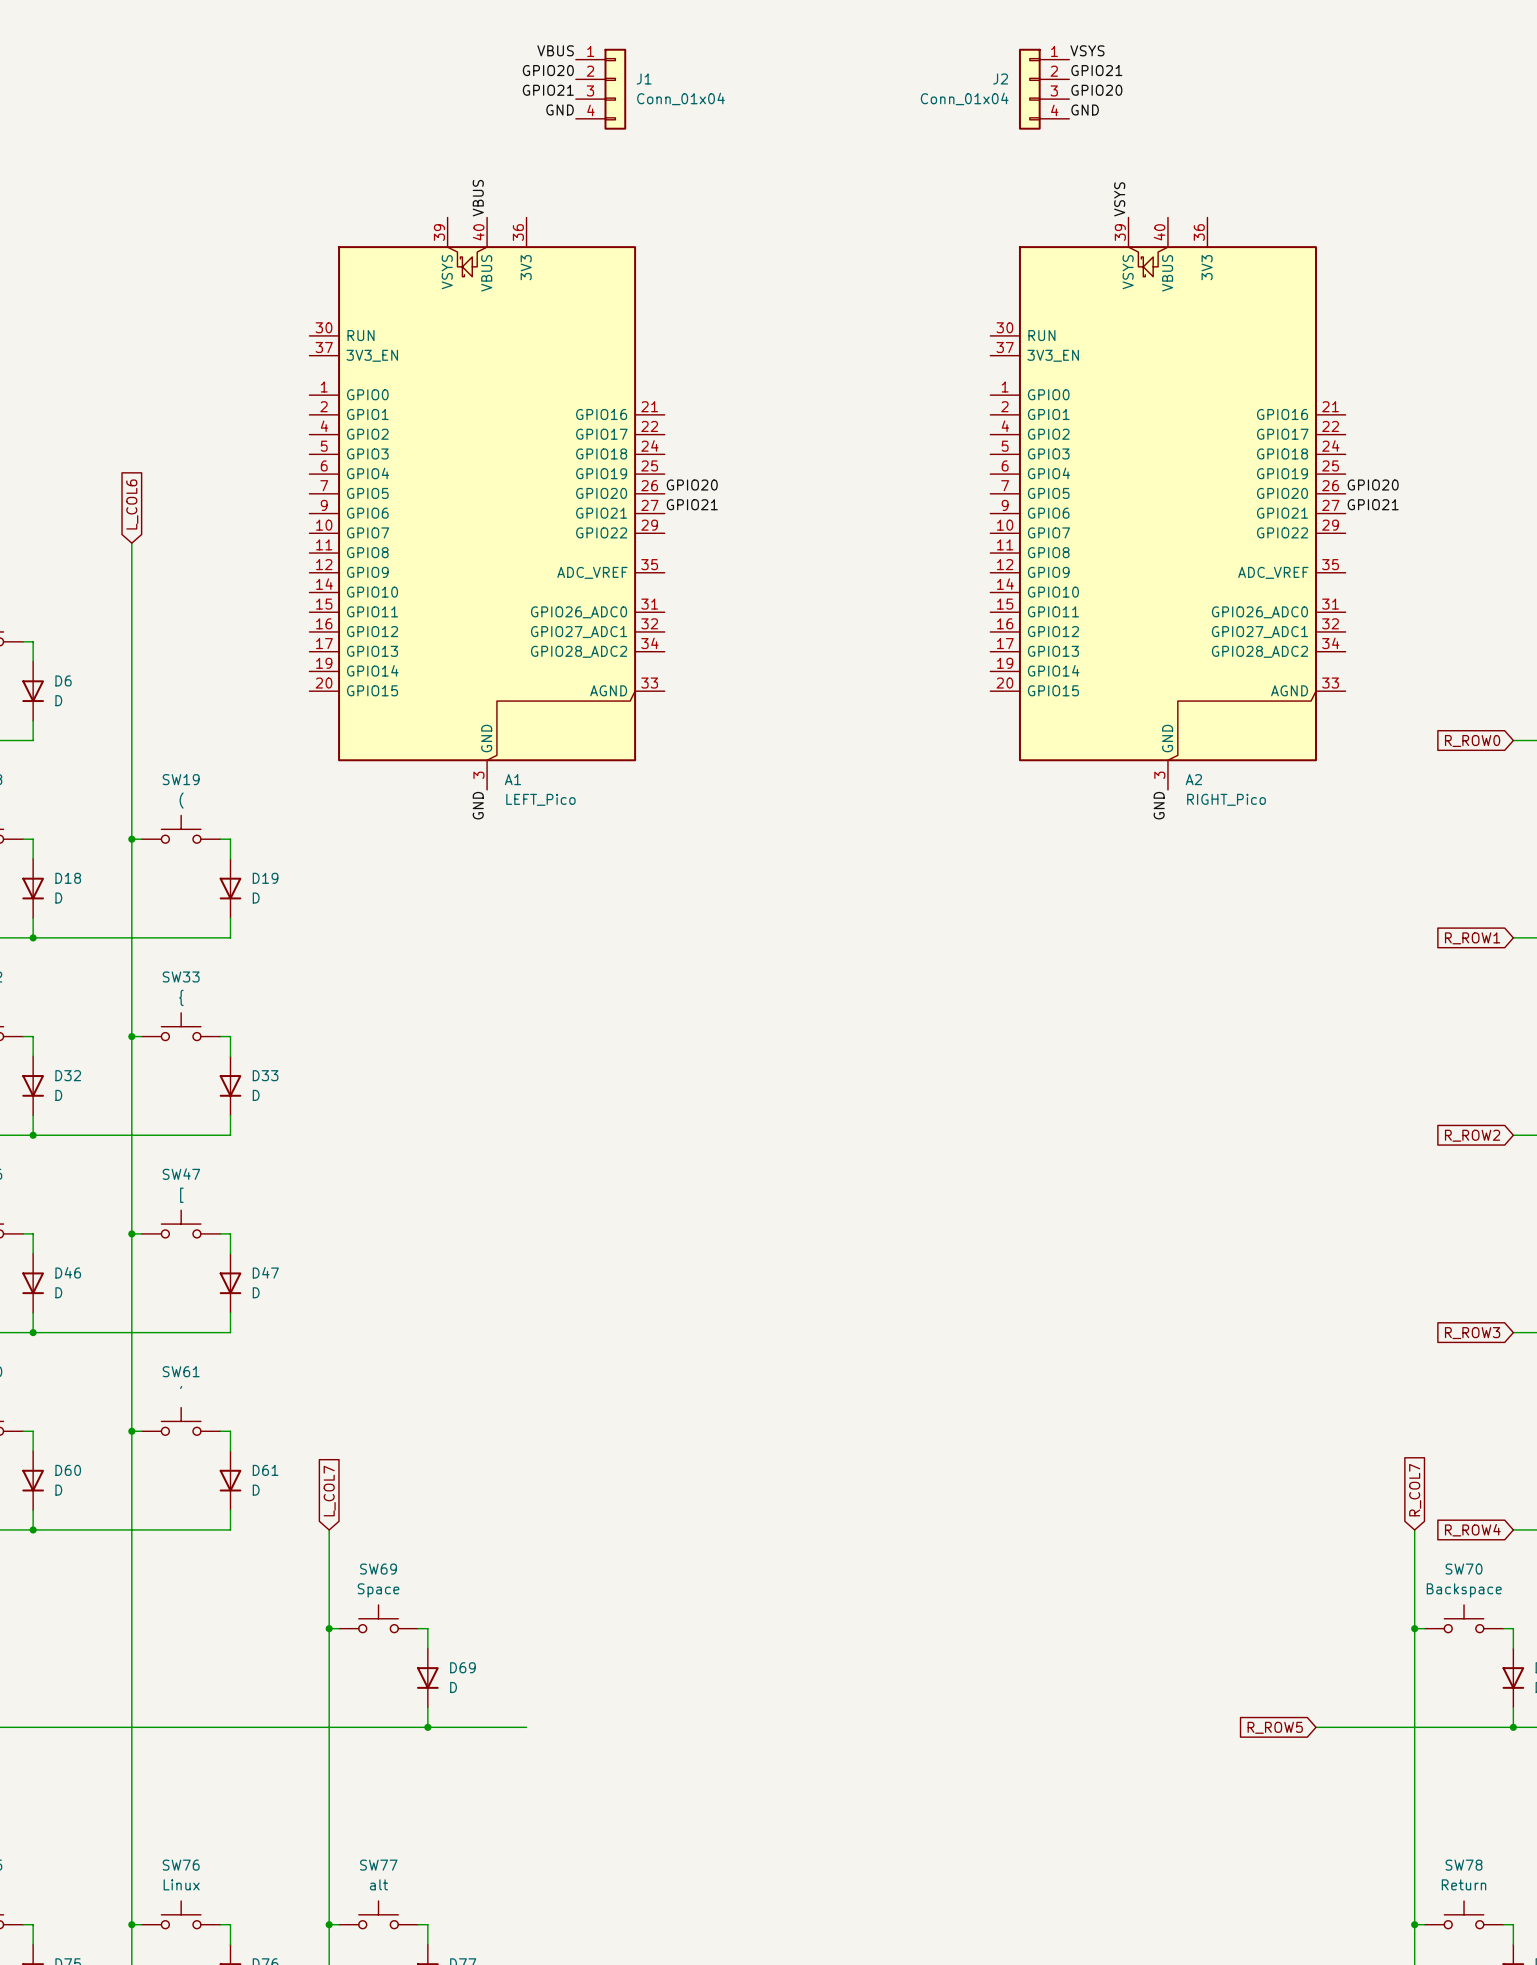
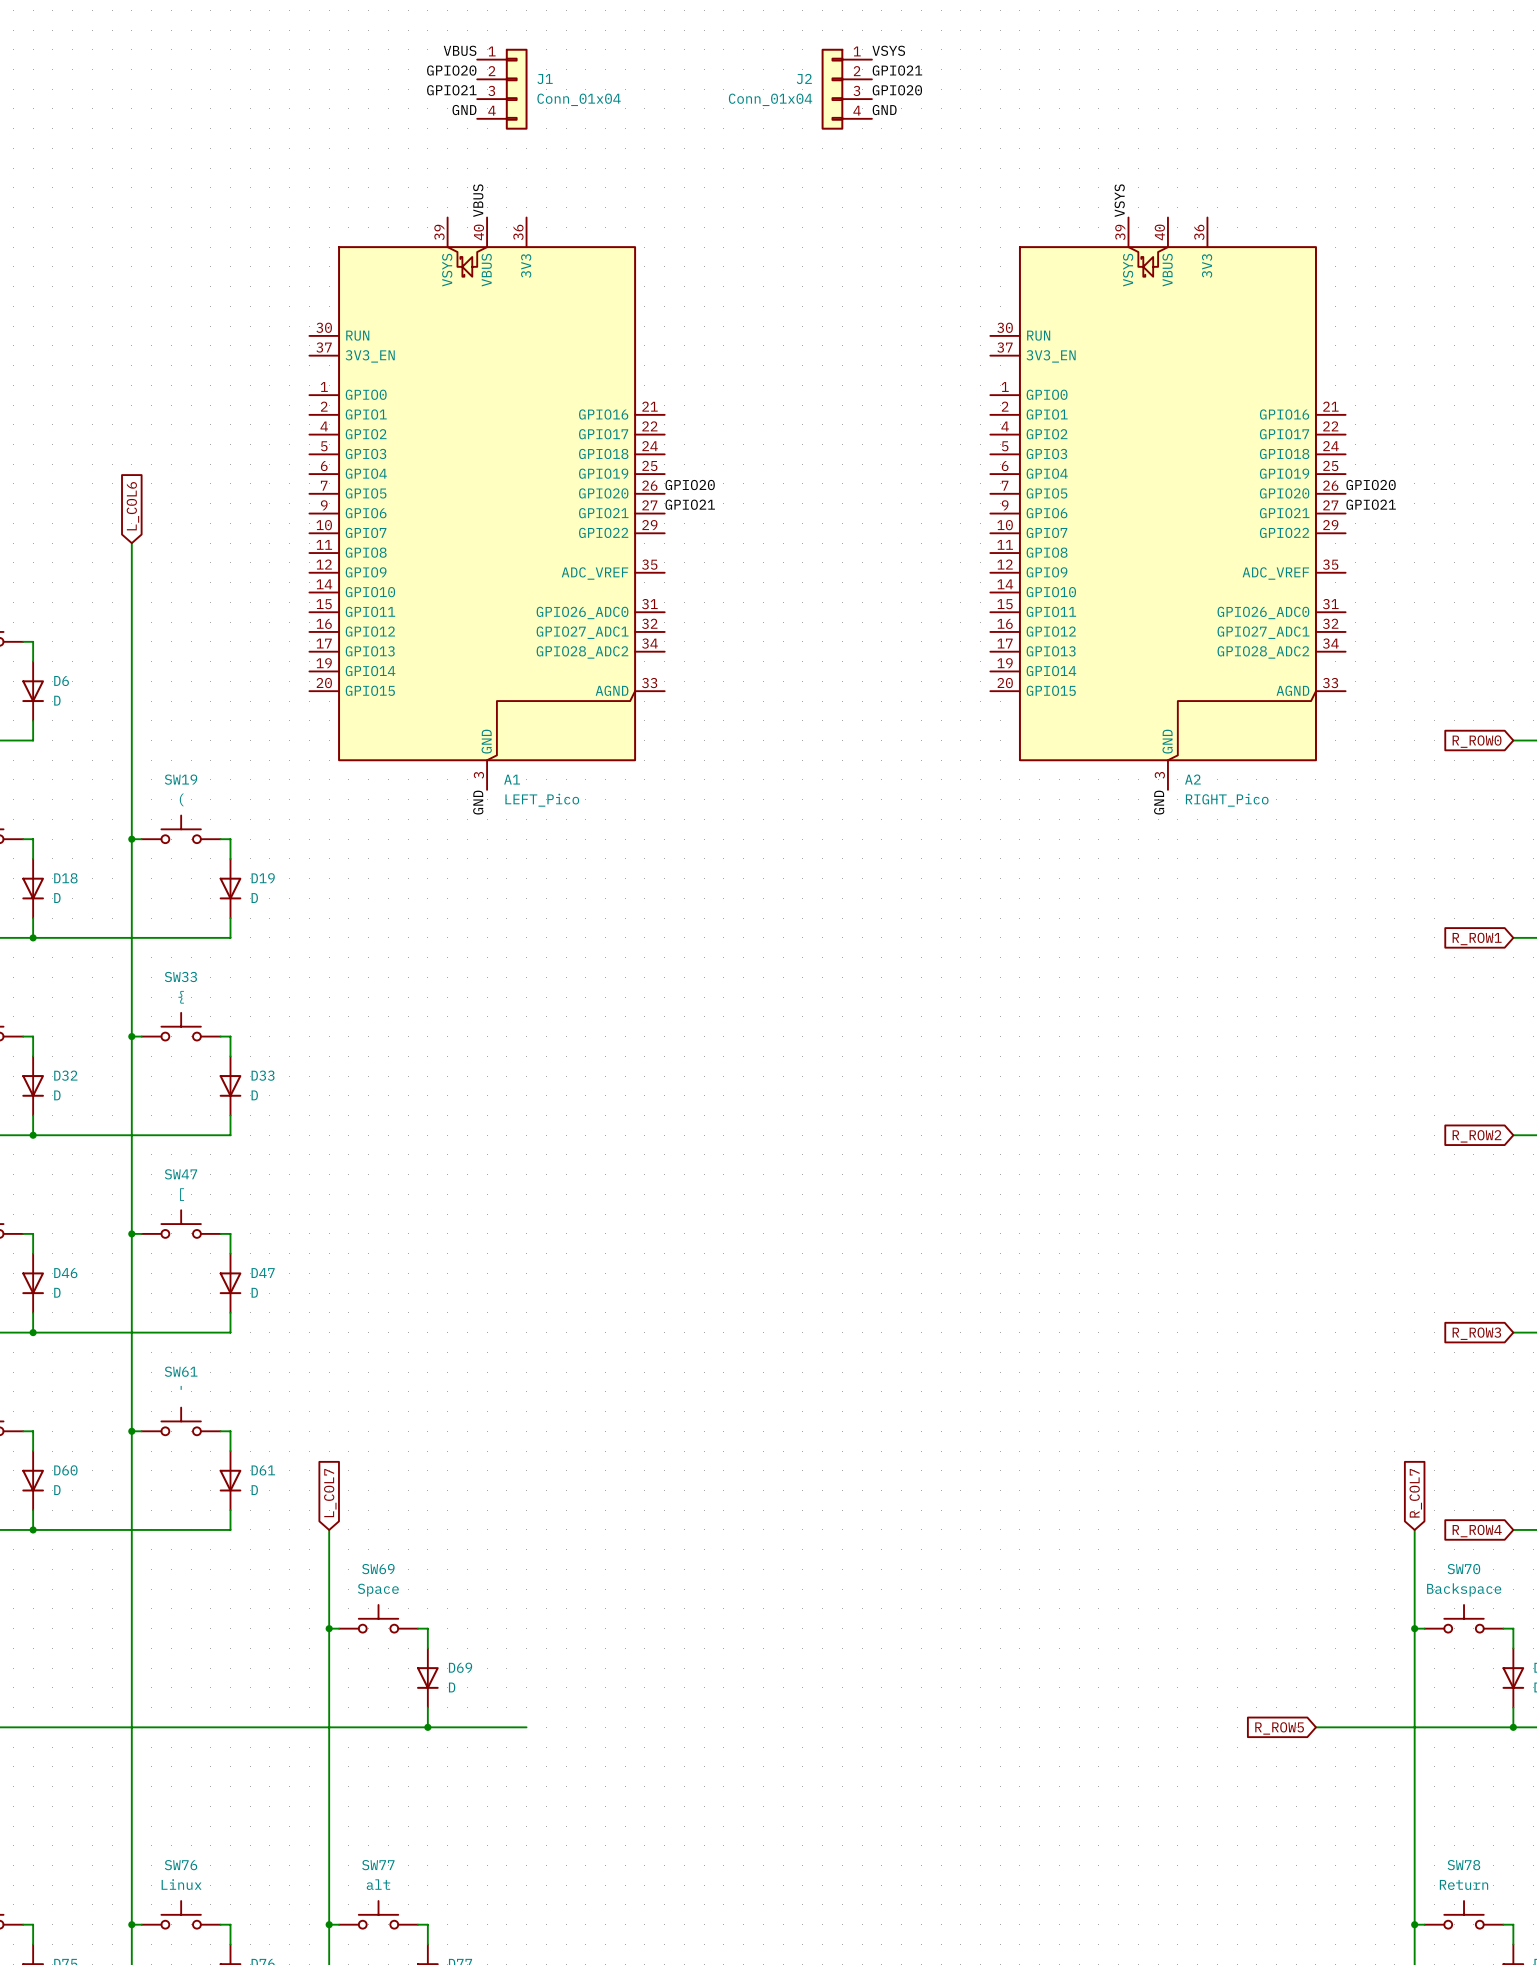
label position: VBUS (555, 50) -> VBUS (460, 50)
label: none -> VSYS (888, 50)
label: VSYS (1087, 50) -> none
label position: GPIO20 (548, 70) -> GPIO20 (451, 70)
label: none -> GPIO21 (897, 70)
label: GPIO21 (1096, 70) -> none
J1 position: (601, 89) -> (502, 89)
J2 position: (1044, 89) -> (846, 89)
label position: GPIO21 (548, 90) -> GPIO21 (451, 90)
label: none -> GPIO20 (897, 90)
label: GPIO20 (1096, 90) -> none
label position: GND (560, 110) -> GND (464, 110)
label: none -> GND (884, 110)
label: GND (1085, 110) -> none

